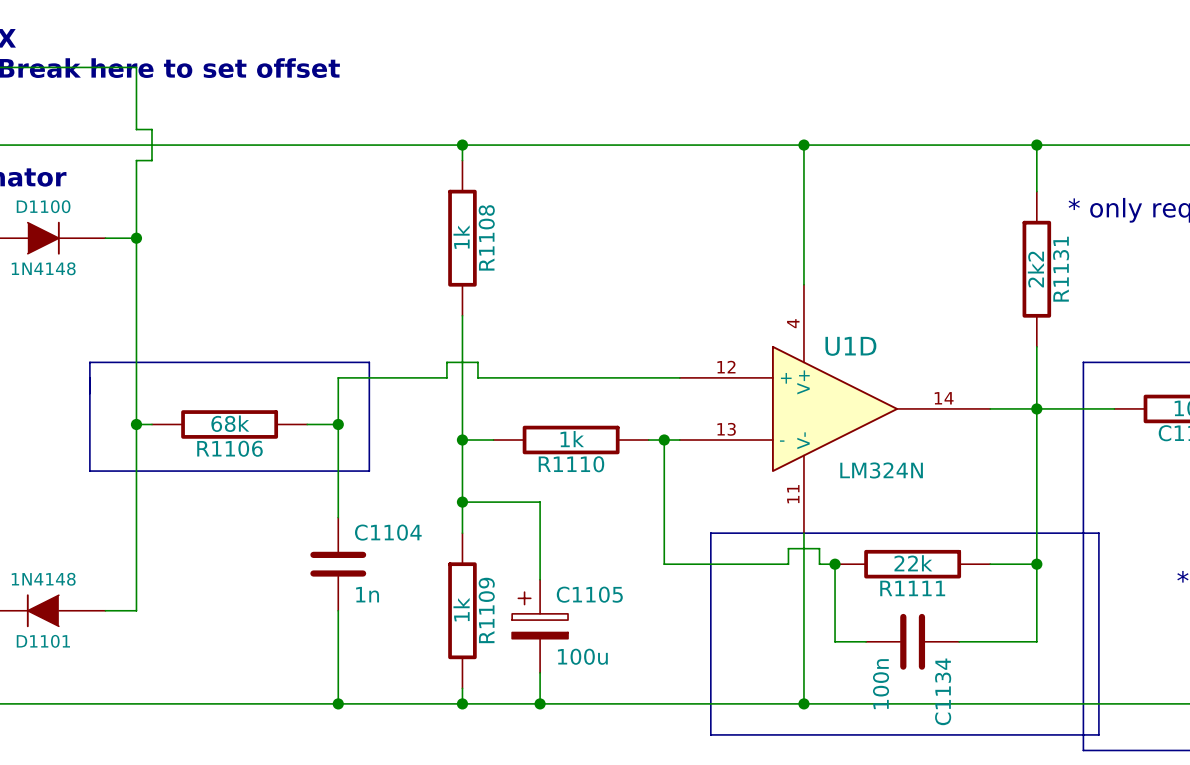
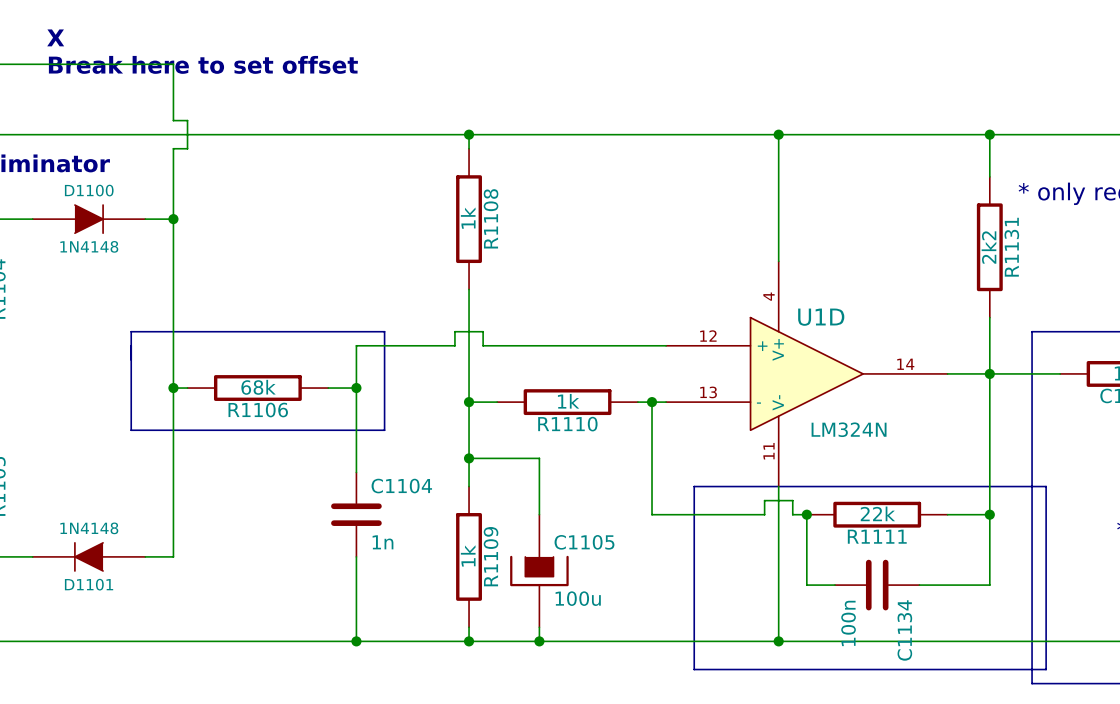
C1105 symbol: [512, 579, 569, 673] -> [510, 514, 569, 628]

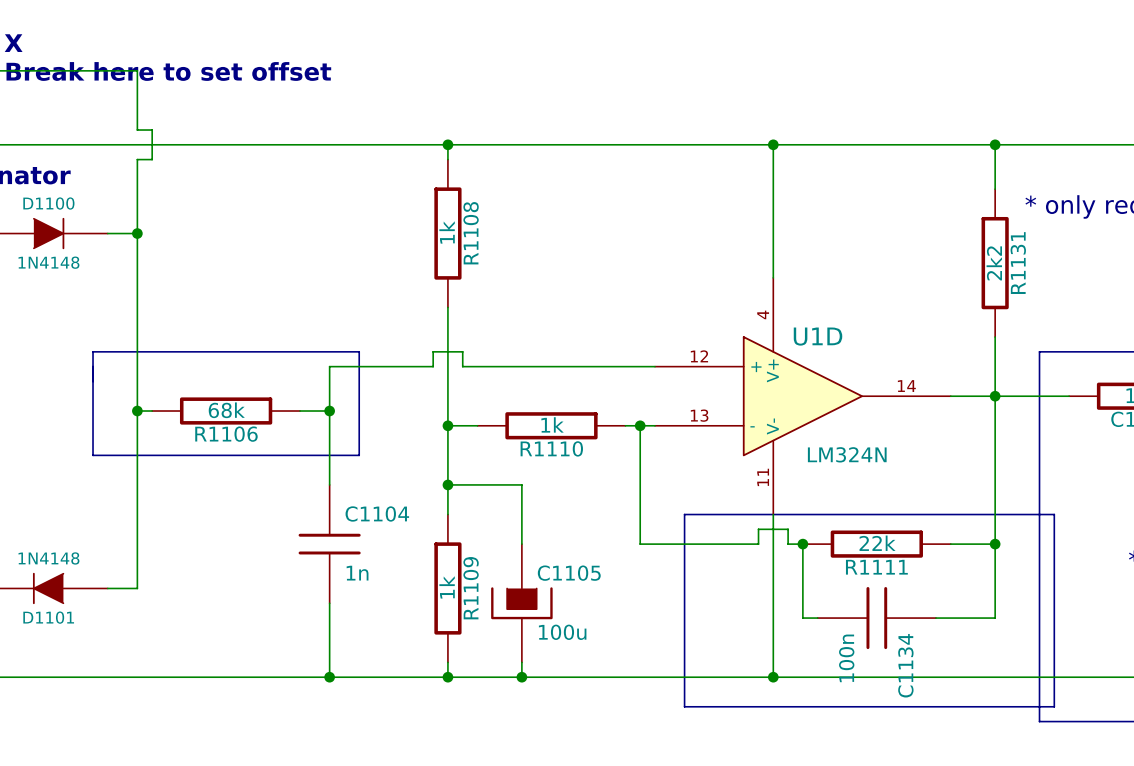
C1104 symbol: [331, 472, 382, 557] -> [298, 484, 361, 604]
C1134 symbol: [834, 559, 920, 611] -> [817, 586, 936, 650]

